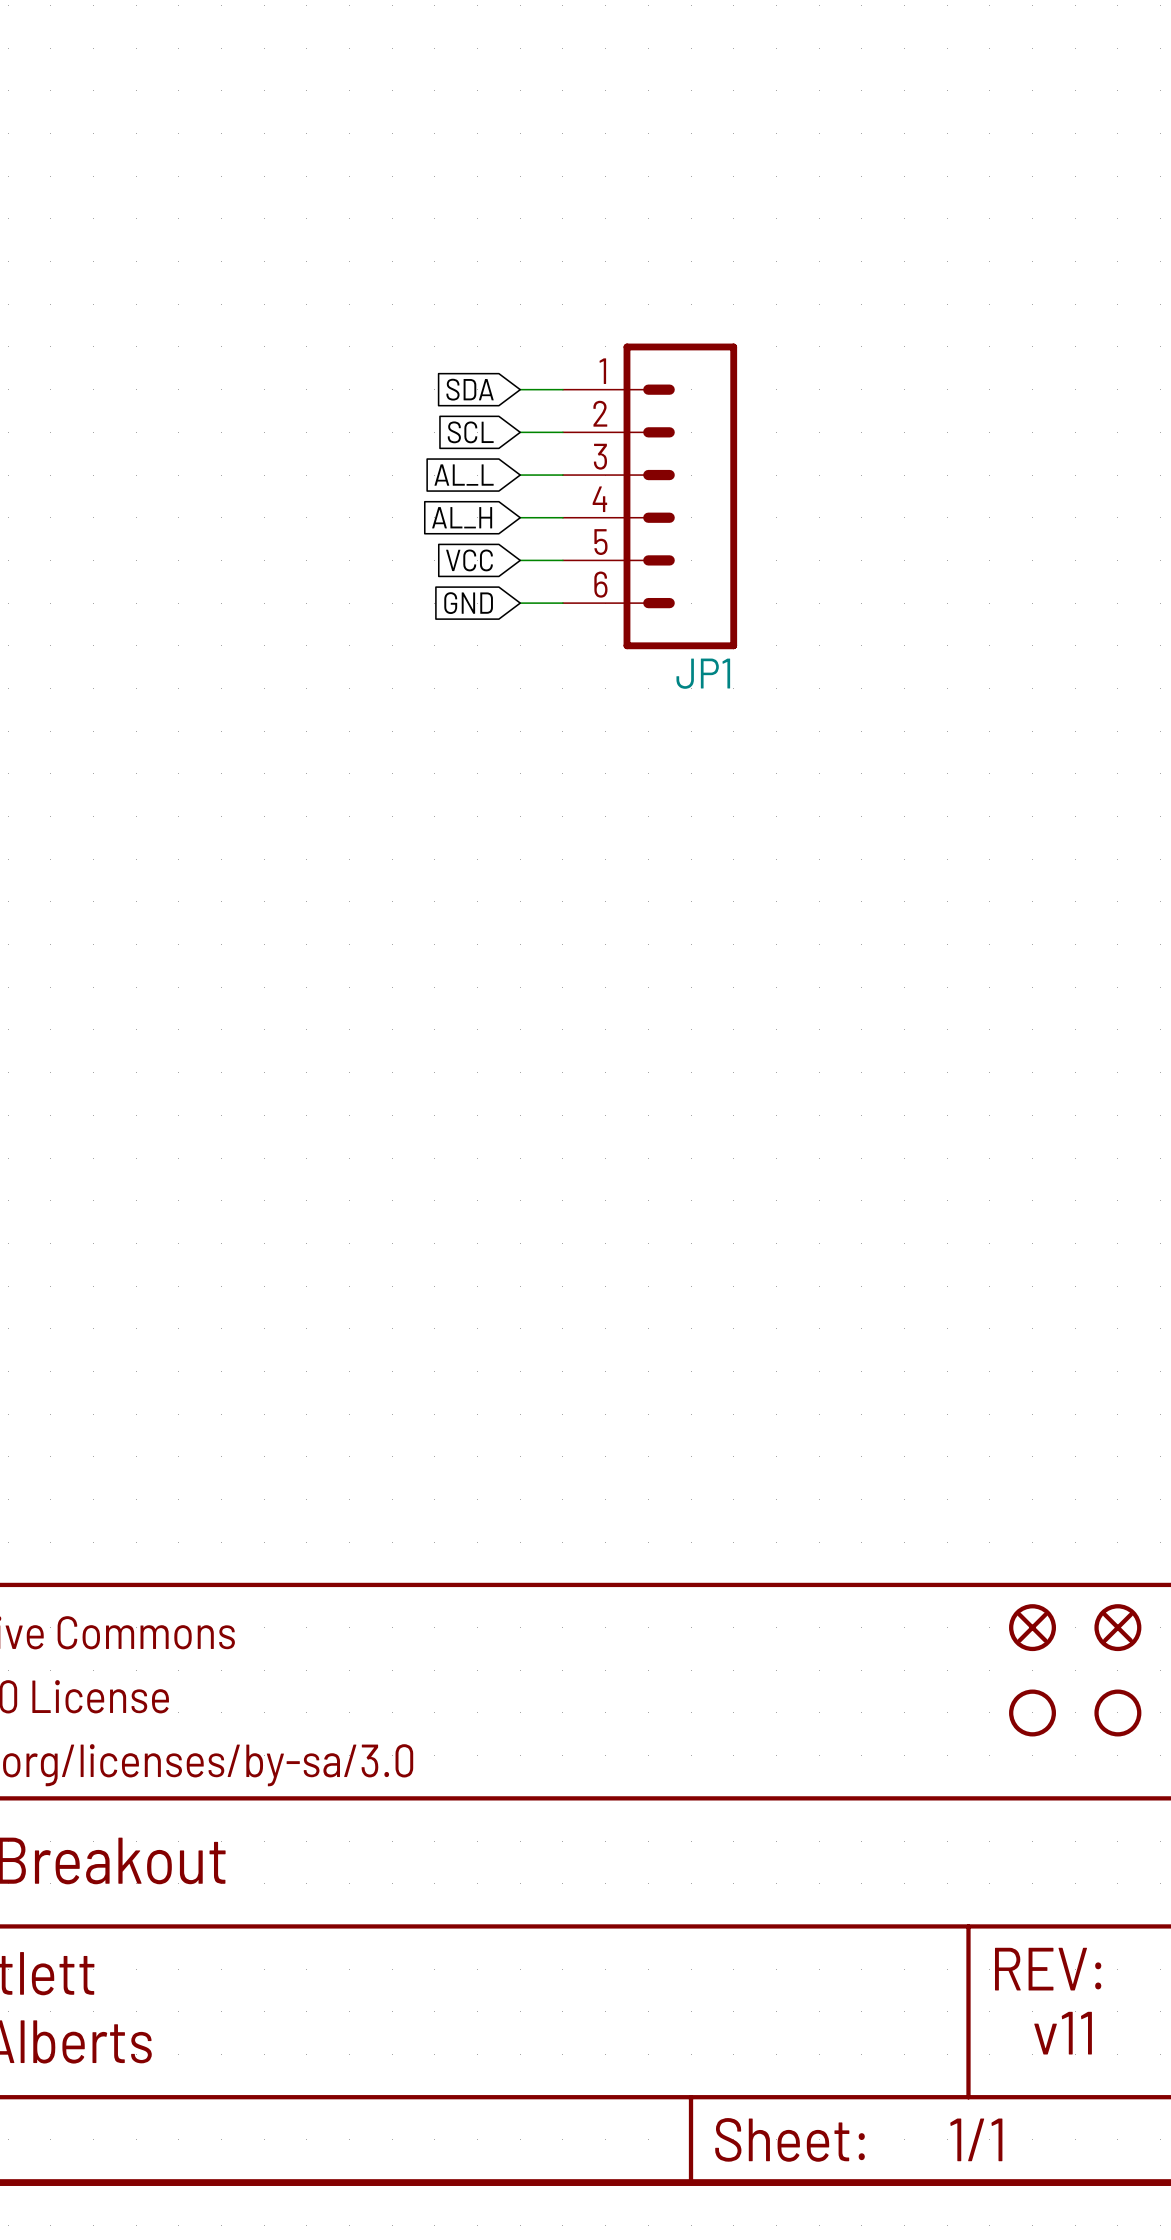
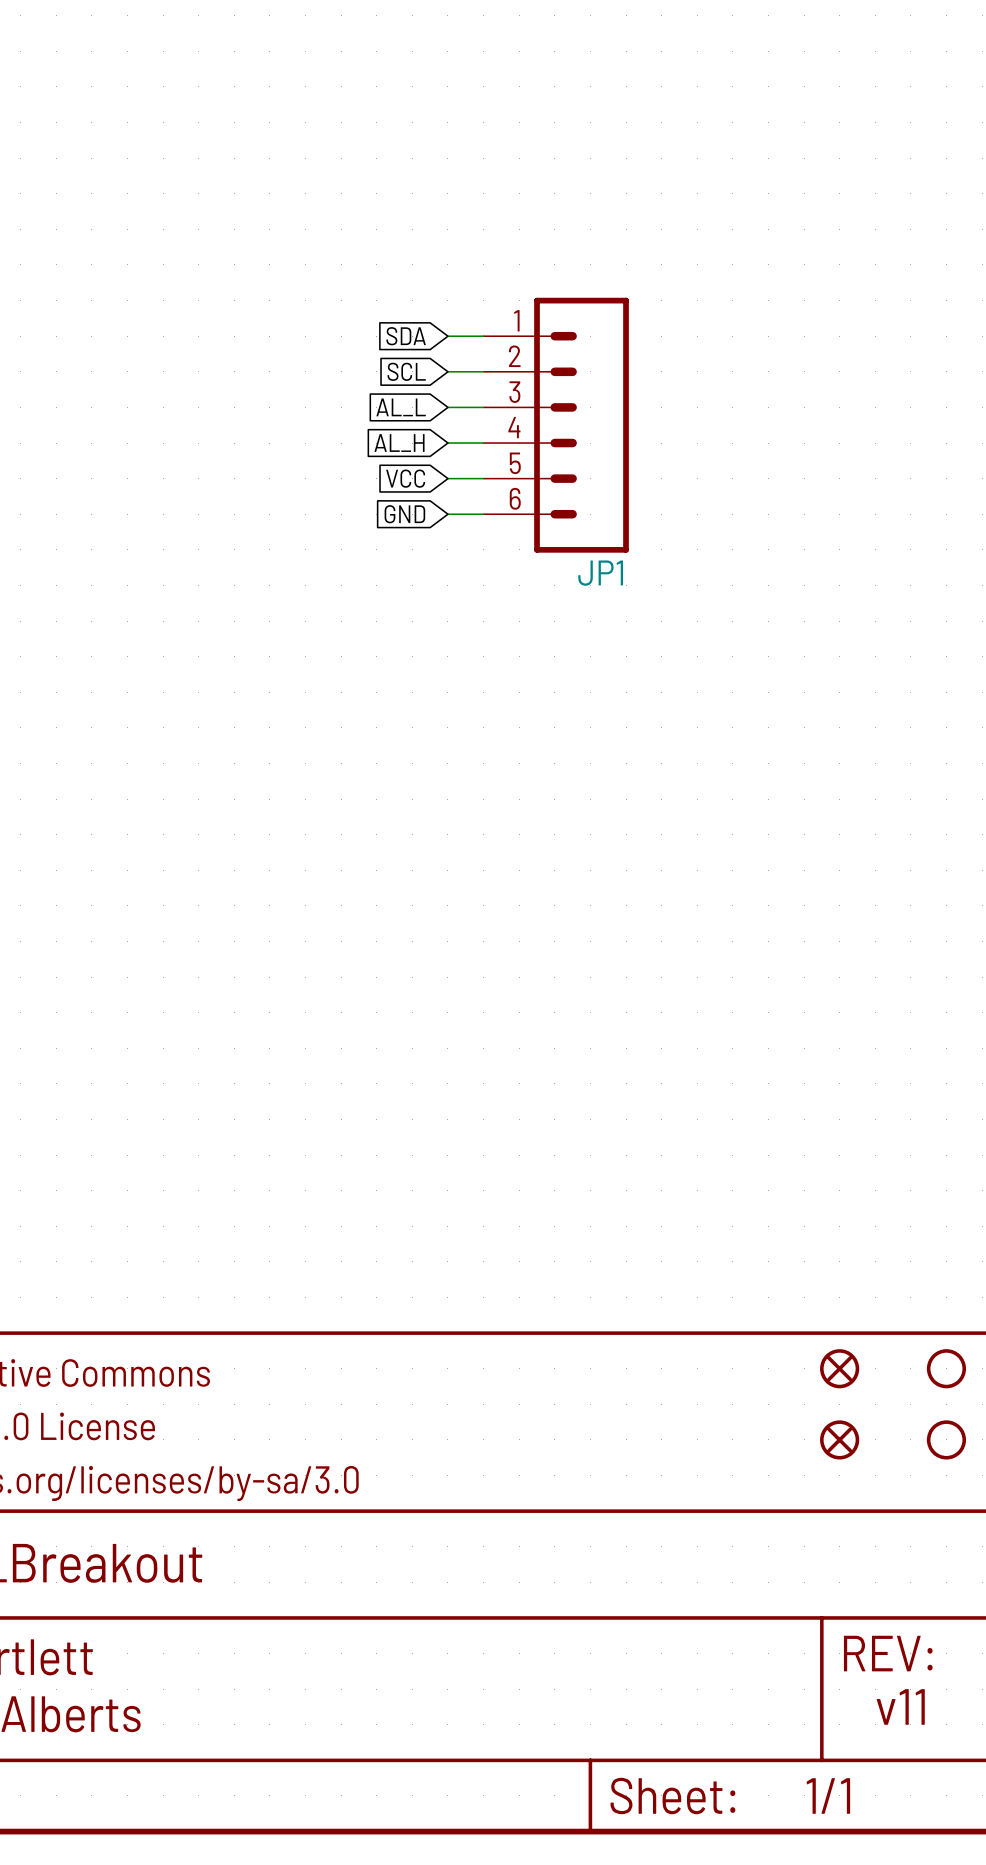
part symbol: [1094, 1604, 1142, 1652] -> [926, 1349, 967, 1389]
part position: (1032, 1627) -> (839, 1368)
part: none -> (839, 1439)
part: (1032, 1712) -> none

